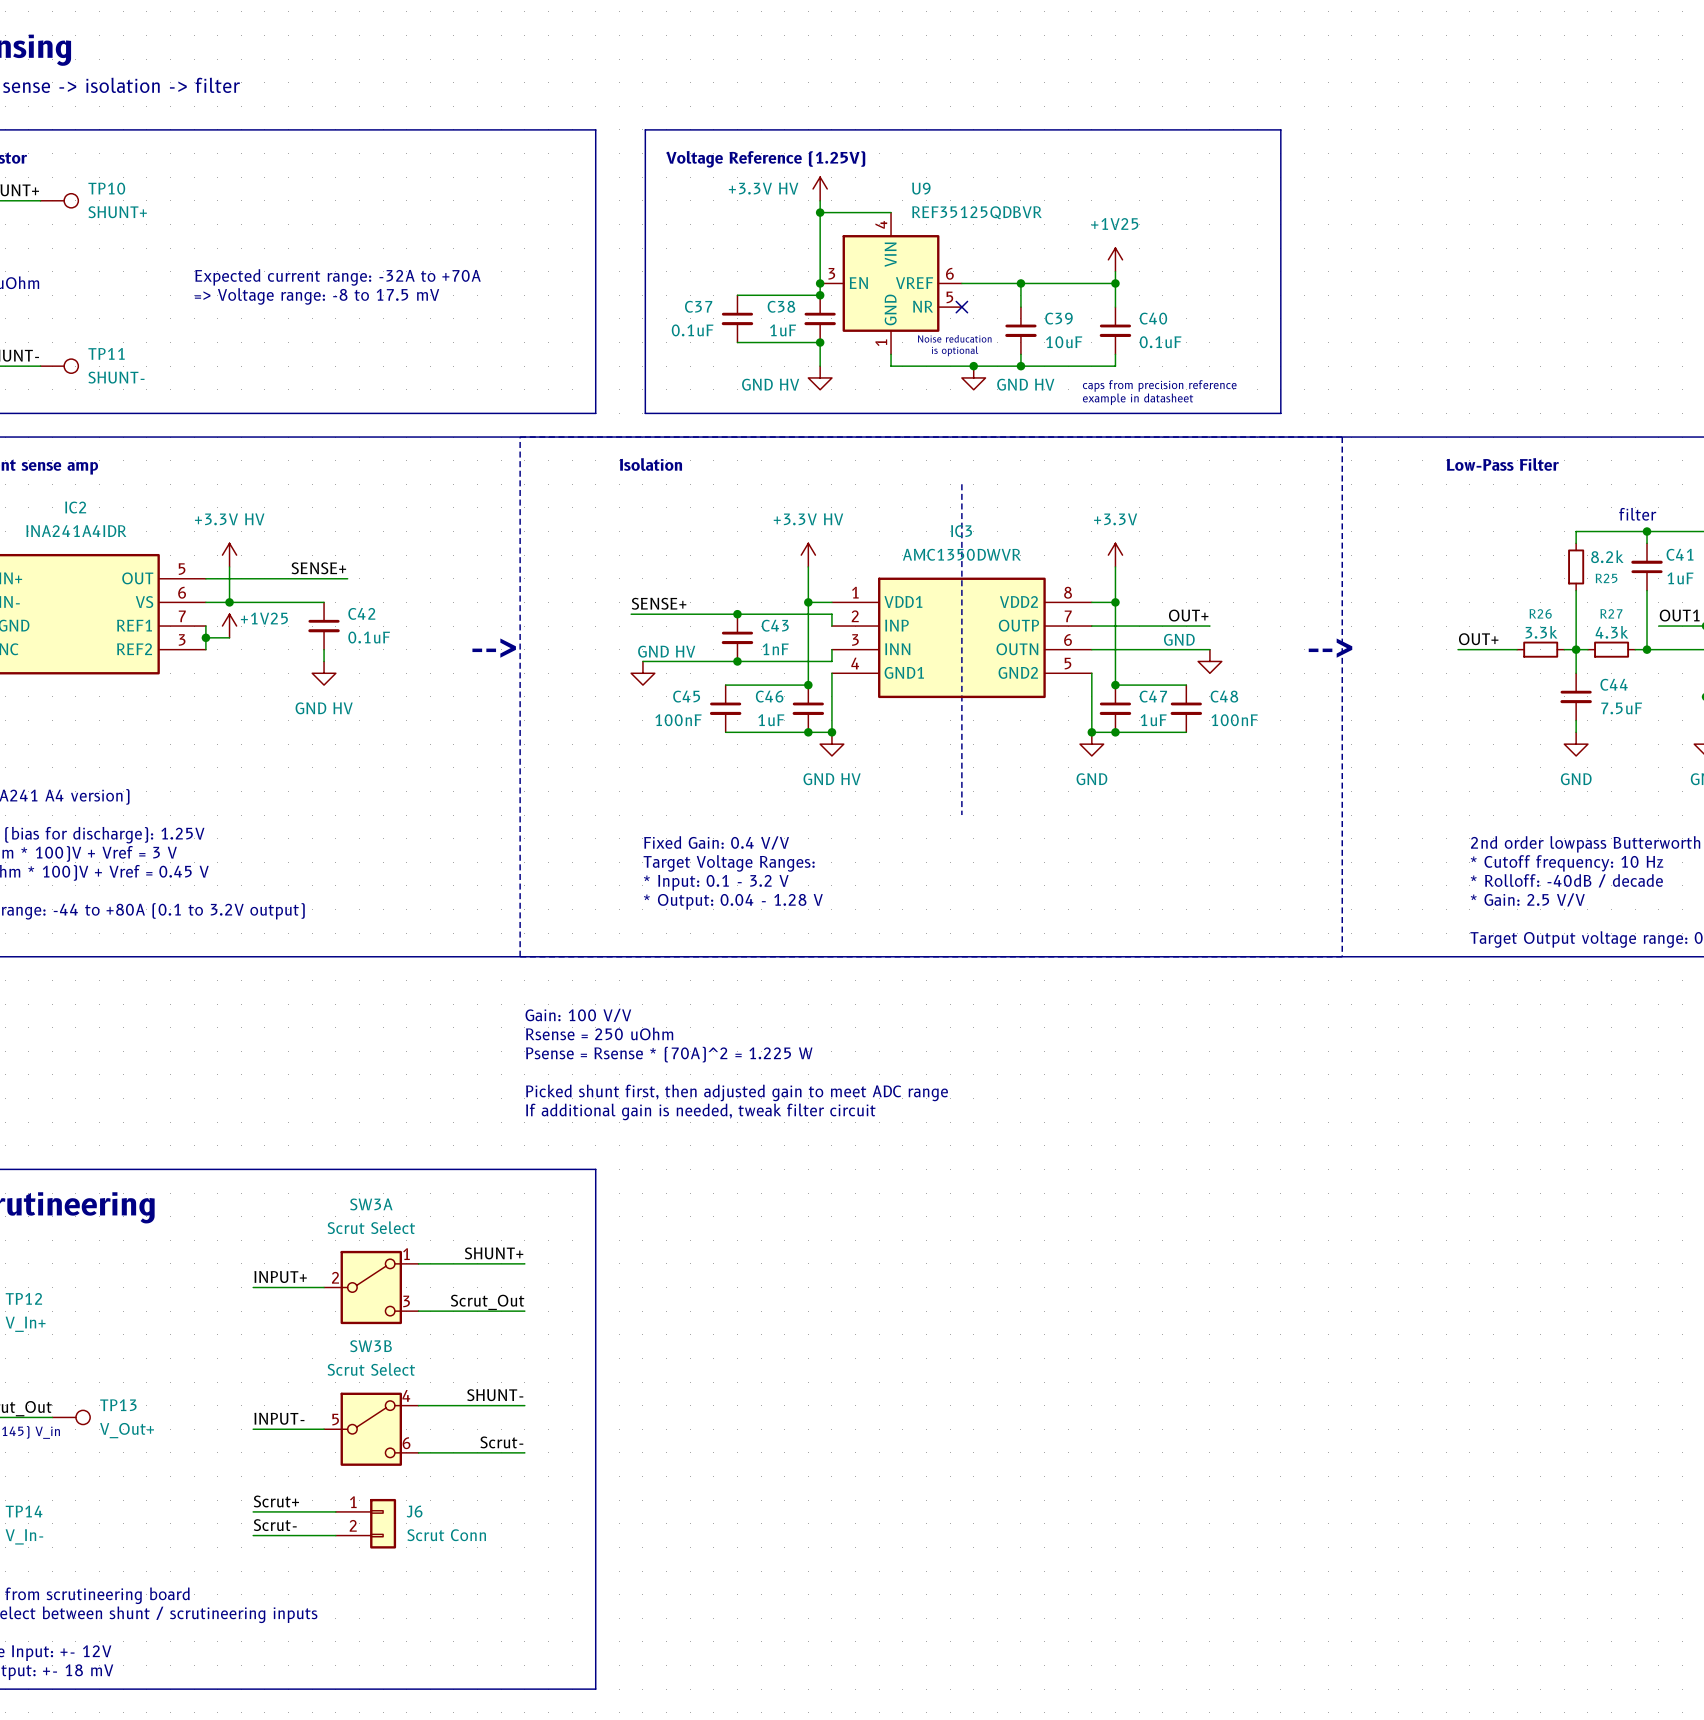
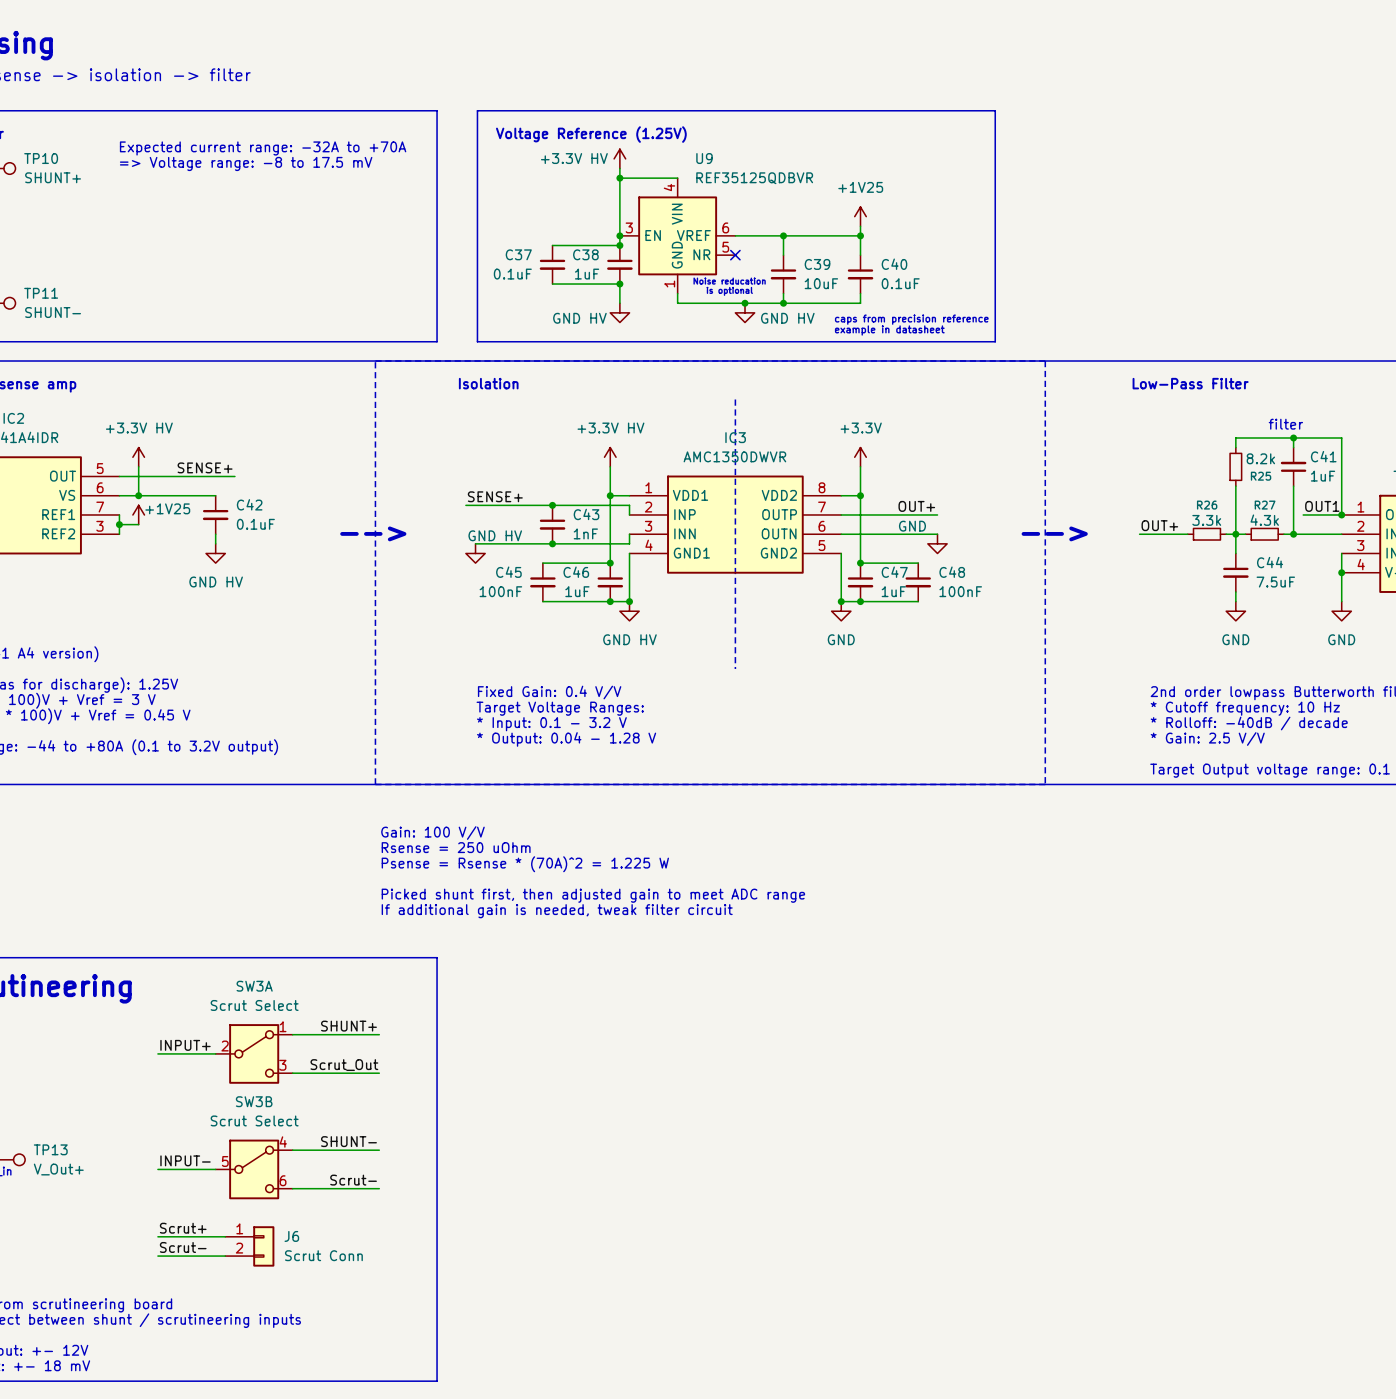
text position: Expected current range: -32A to +70A (338, 277) -> Expected current range: -32A to +70A (263, 148)
text position: => Voltage range: -8 to 17.5 mV (317, 296) -> => Voltage range: -8 to 17.5 mV (246, 163)

